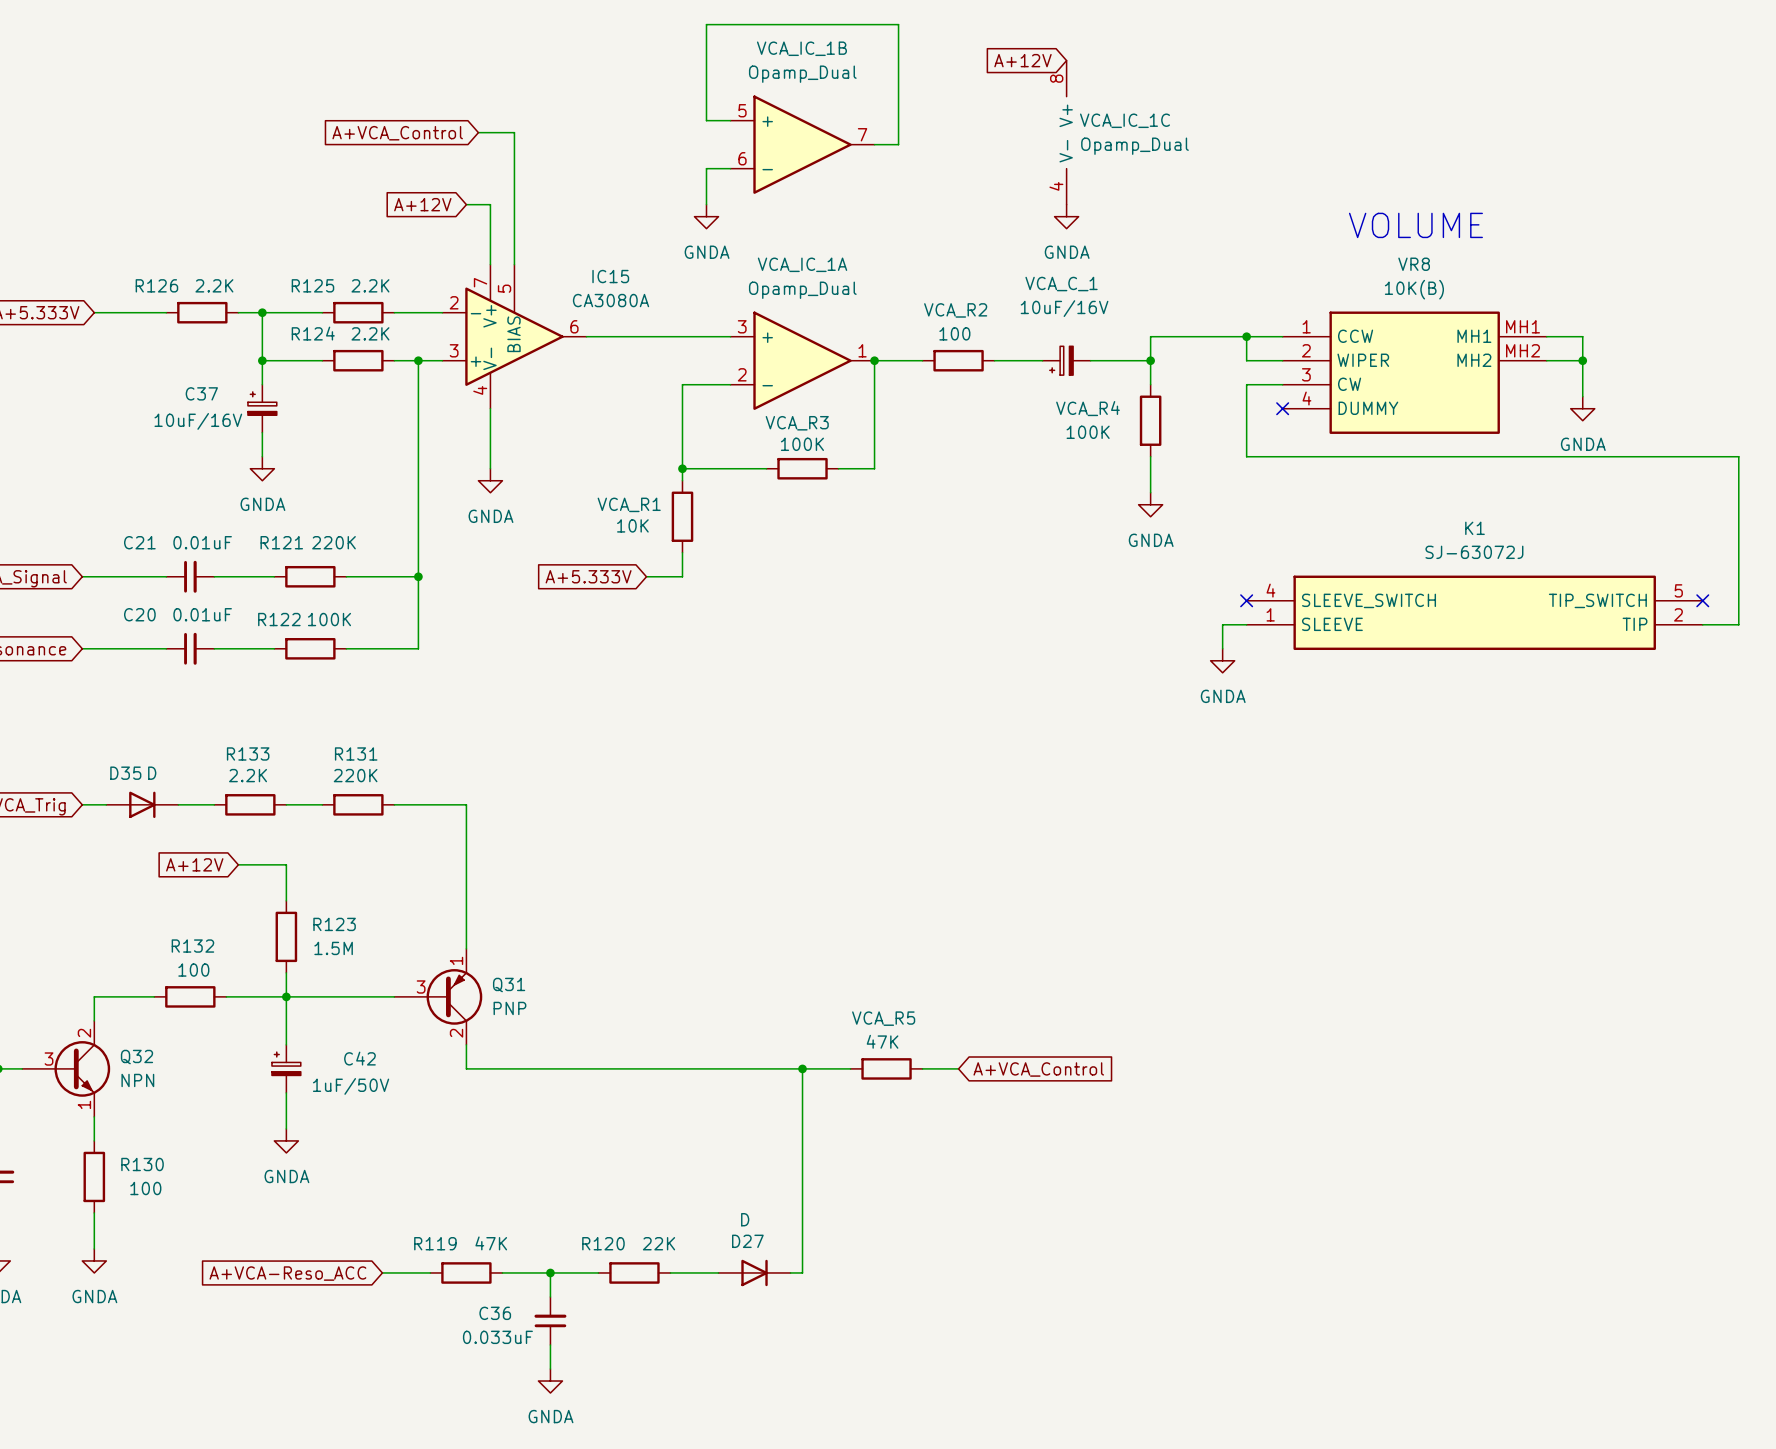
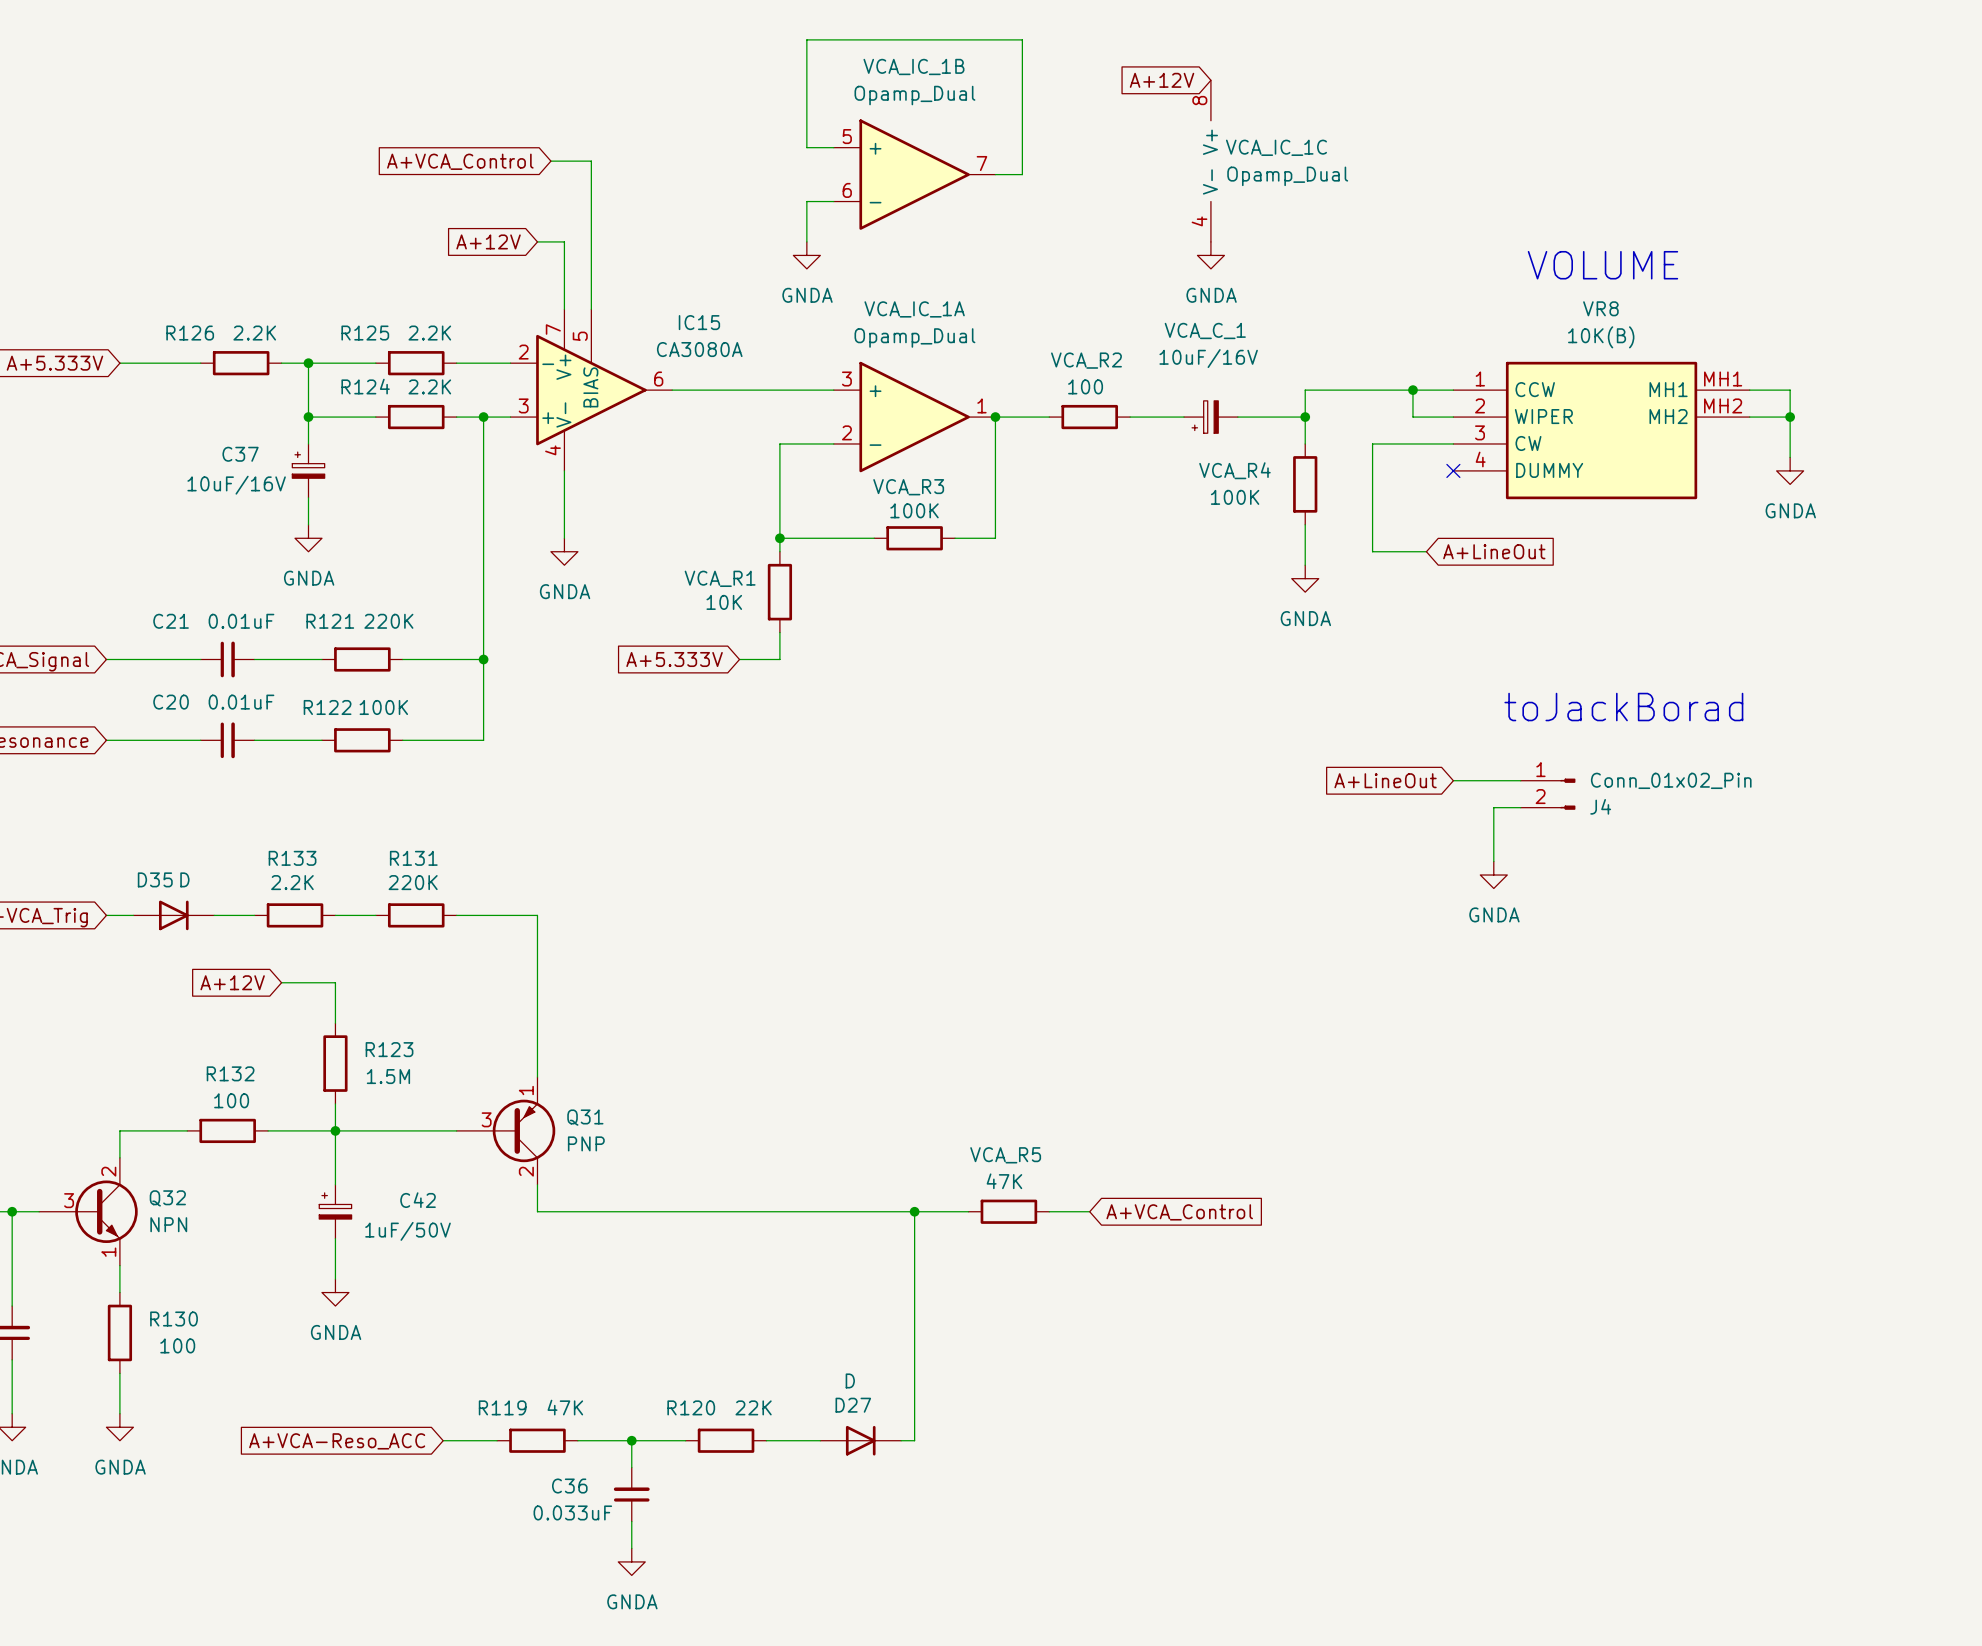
wire: (1246, 384) (1246, 456) (1738, 456) (1738, 624) (1702, 624) -> (1412, 443) (1372, 443) (1372, 551) (1426, 551)
global label: none -> A+LineOut (1494, 551)
no-connect mark: (1246, 600) -> none
no-connect mark: (1702, 600) -> none
K1: SJ-63072J (1474, 612) -> none
text: none -> toJackBorad (1623, 707)
wire: (1246, 624) (1222, 624) (1222, 648) -> none
power symbol position: GNDA (1222, 660) -> GNDA (1493, 875)
global label: none -> A+LineOut (1385, 780)
wire: none -> (1453, 780) (1520, 780)
J4: none -> Conn_01x02_Pin (1548, 794)
wire: none -> (1520, 807) (1493, 807) (1493, 861)

